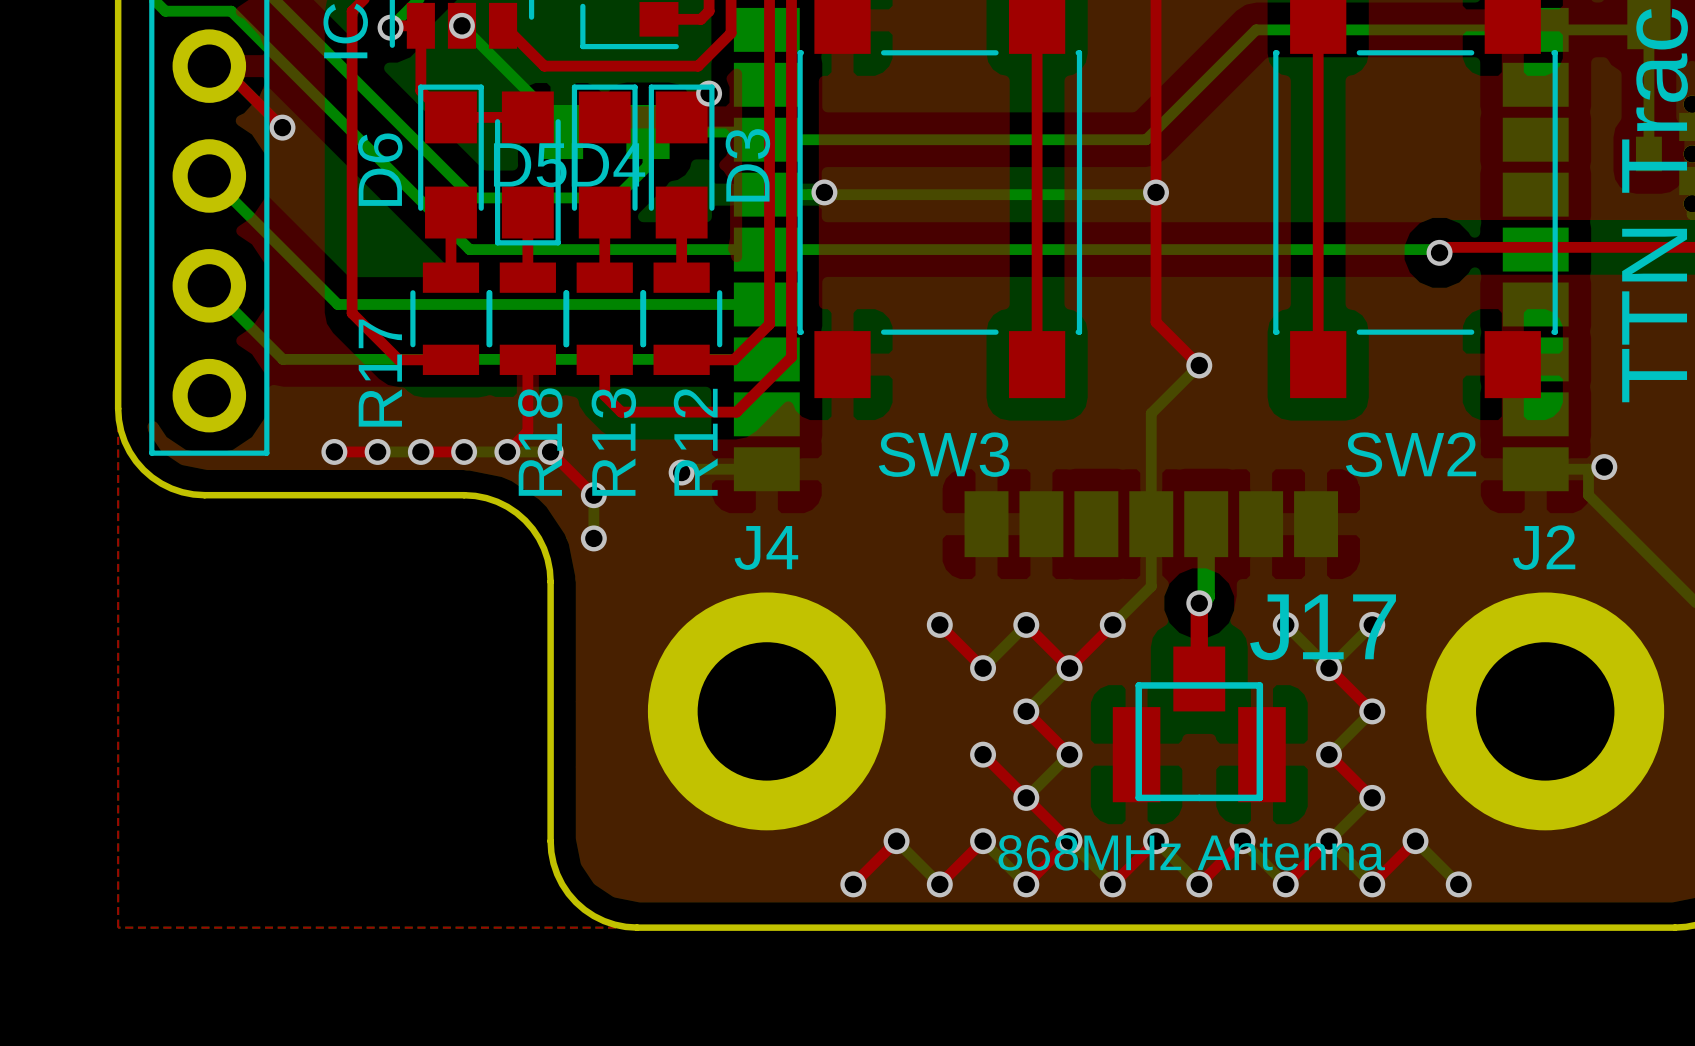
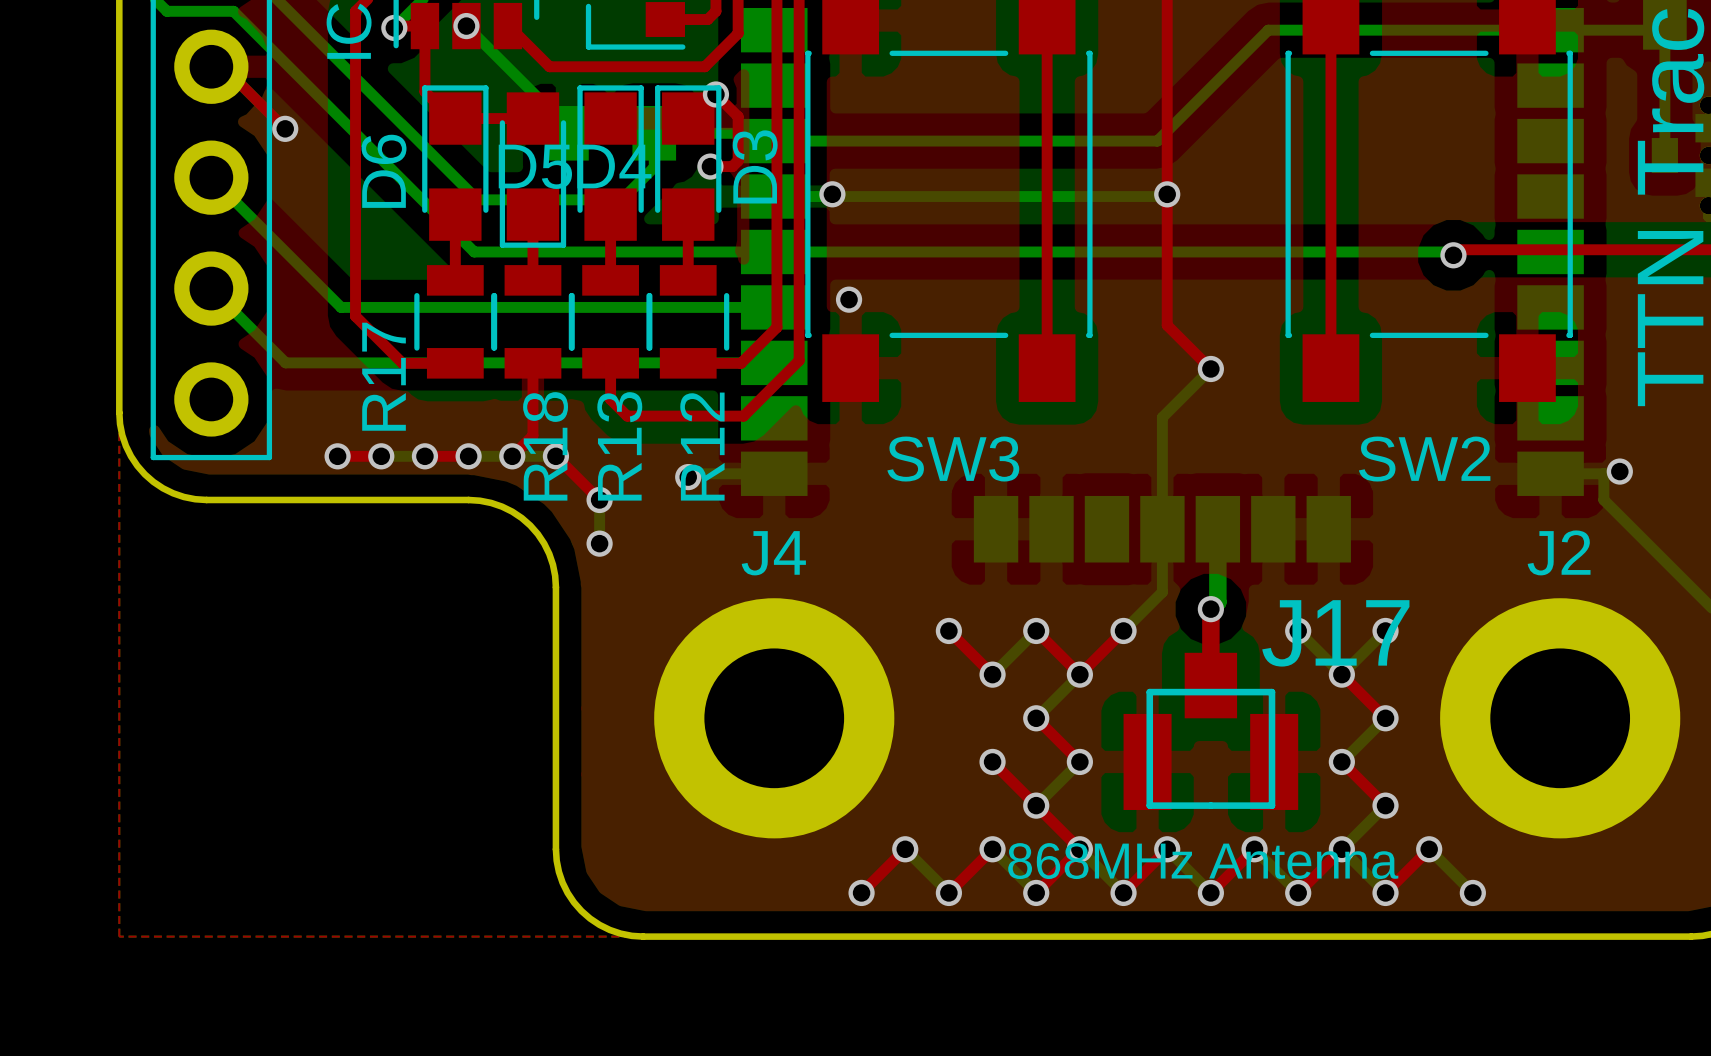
top track: none -> (715, 94) (738, 116) (738, 161) (732, 166) (710, 166)
via: none -> (710, 166)
via: none -> (849, 299)

